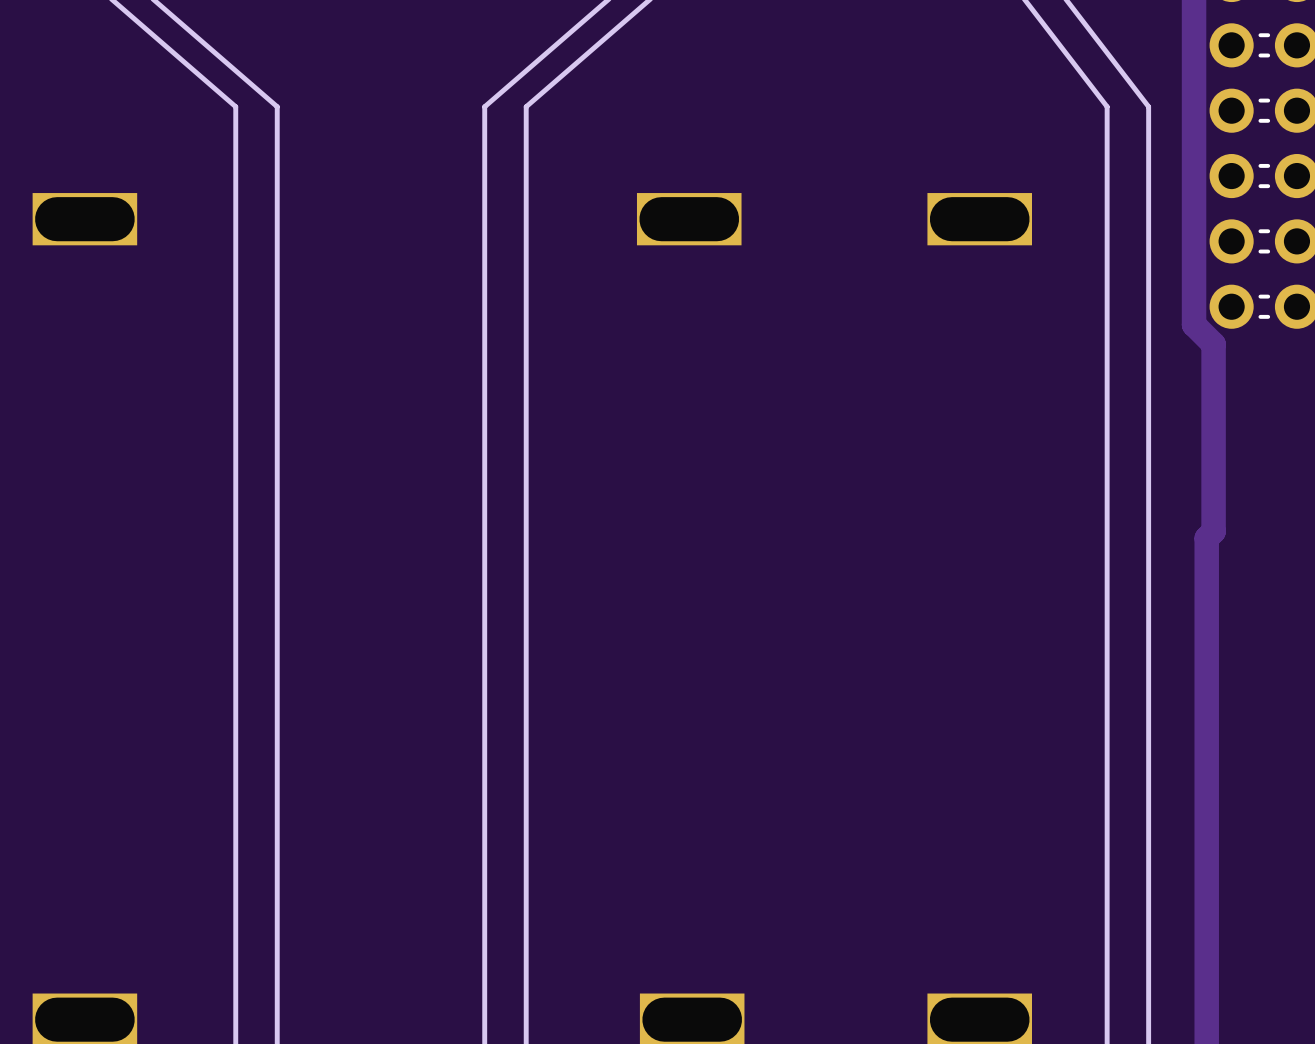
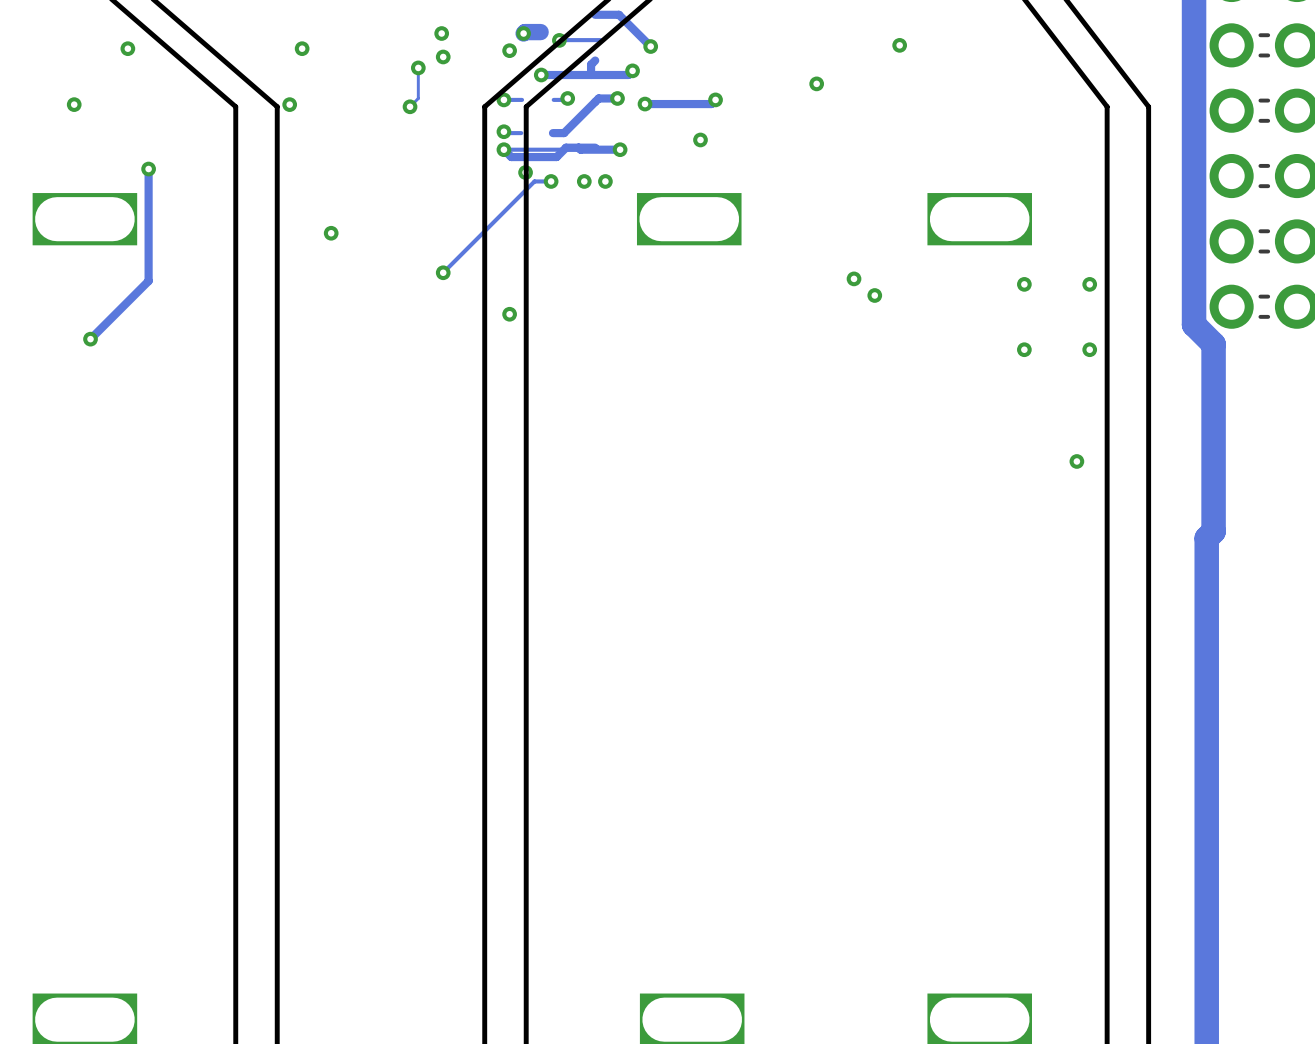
track: none -> (595, 14) (618, 14) (650, 46)
track: none -> (540, 32) (523, 33)
via: none -> (441, 33)
via: none -> (523, 33)
via: none -> (559, 40)
track: none -> (600, 40) (559, 40)
via: none -> (899, 45)
via: none -> (650, 46)
via: none -> (127, 48)
via: none -> (302, 48)
via: none -> (509, 50)
via: none -> (443, 56)
track: none -> (595, 60) (591, 64) (591, 75)
track: none -> (418, 67) (418, 98) (410, 106)
via: none -> (418, 67)
track: none -> (632, 70) (628, 75) (541, 75)
via: none -> (632, 70)
via: none -> (541, 75)
via: none -> (816, 83)
track: none -> (567, 98) (553, 99)
via: none -> (567, 98)
track: none -> (617, 98) (598, 98) (564, 133) (552, 133)
via: none -> (617, 98)
via: none -> (503, 99)
track: none -> (522, 99) (503, 99)
track: none -> (715, 99) (711, 104) (645, 104)
via: none -> (715, 99)
via: none -> (74, 104)
via: none -> (289, 104)
via: none -> (645, 104)
via: none -> (410, 106)
track: none -> (503, 131) (521, 133)
via: none -> (503, 131)
via: none -> (700, 139)
track: none -> (595, 147) (566, 147) (556, 157) (511, 157) (503, 149) (620, 149) (580, 149) (578, 147)
via: none -> (503, 149)
via: none -> (620, 149)
track: none -> (148, 169) (148, 281) (90, 339)
via: none -> (148, 169)
via: none -> (525, 172)
track: none -> (551, 181) (534, 181) (443, 272)
via: none -> (551, 181)
via: none -> (584, 181)
via: none -> (605, 181)
via: none -> (331, 233)
via: none -> (443, 272)
via: none -> (854, 278)
via: none -> (1024, 284)
via: none -> (1089, 284)
via: none -> (874, 295)
via: none -> (509, 314)
via: none -> (90, 339)
via: none -> (1024, 349)
via: none -> (1089, 349)
via: none -> (1076, 461)

